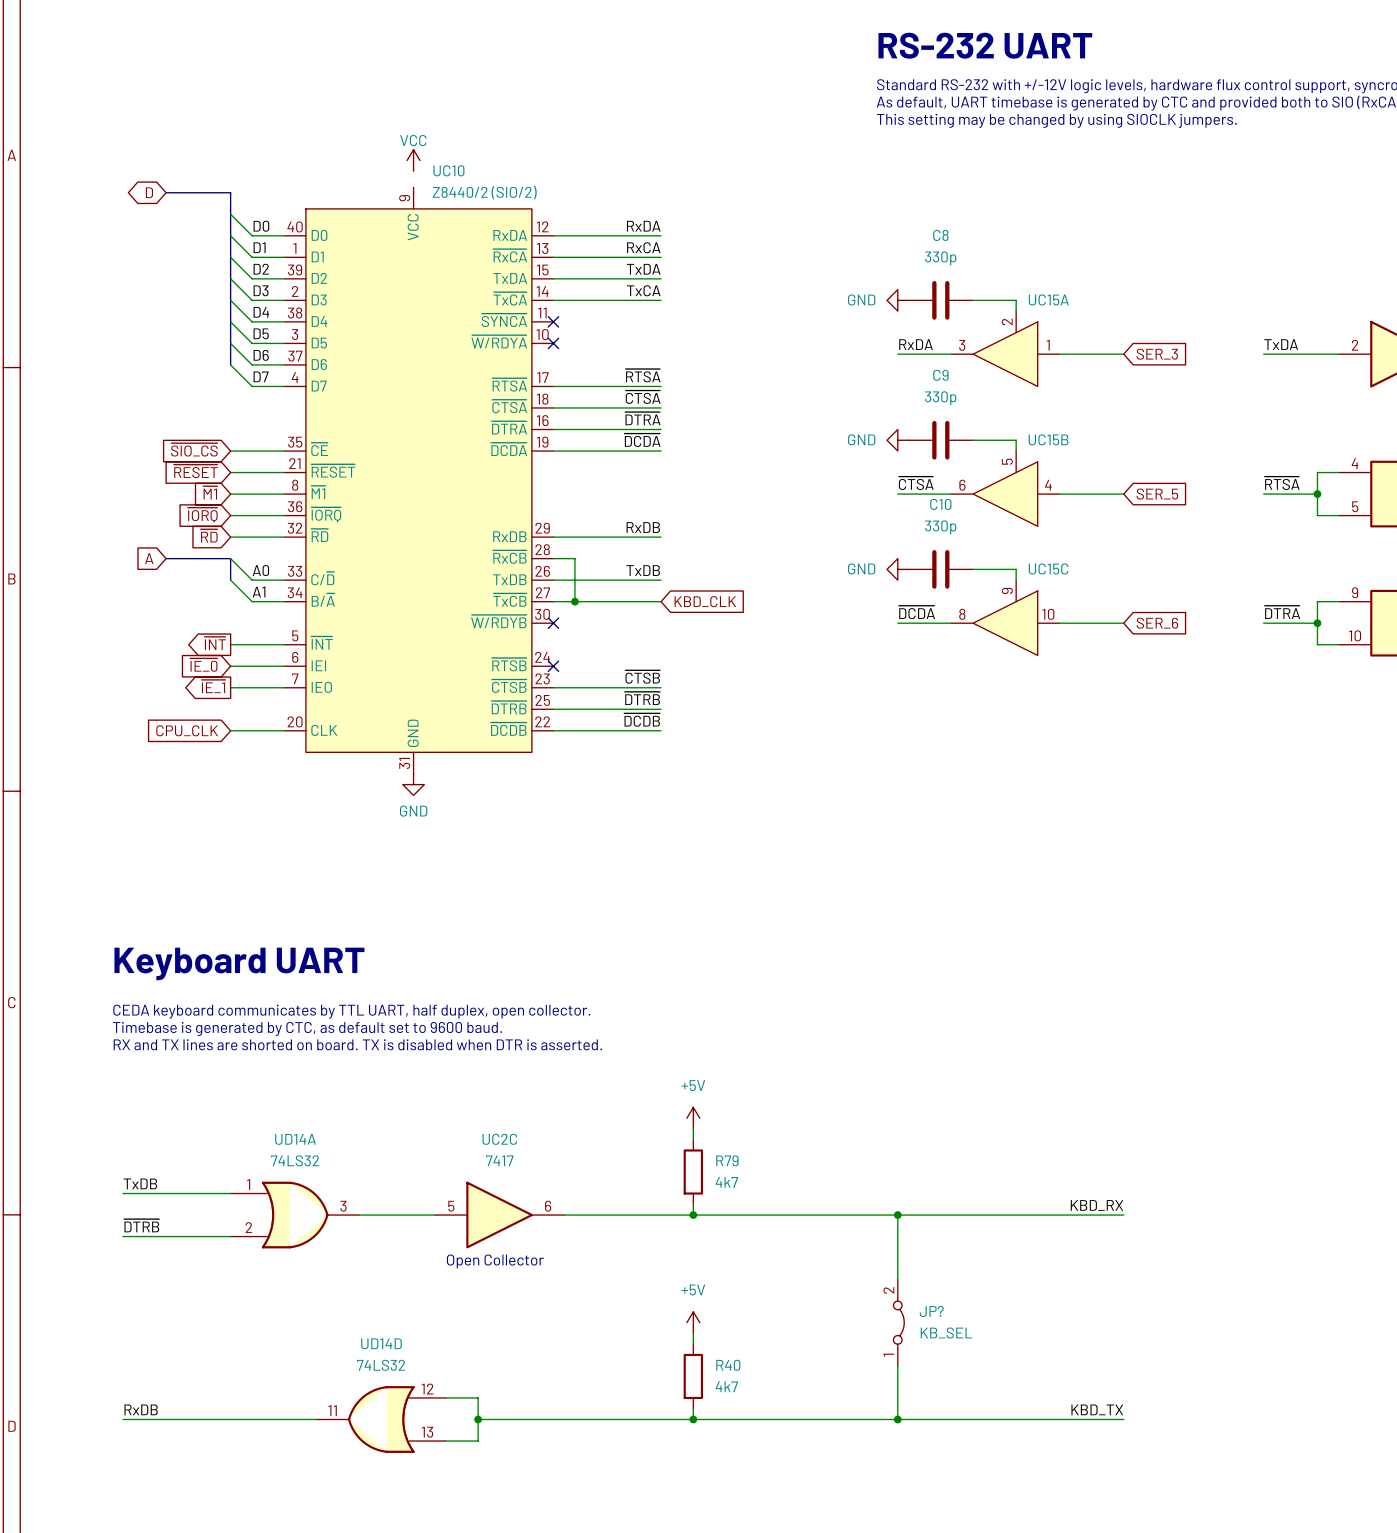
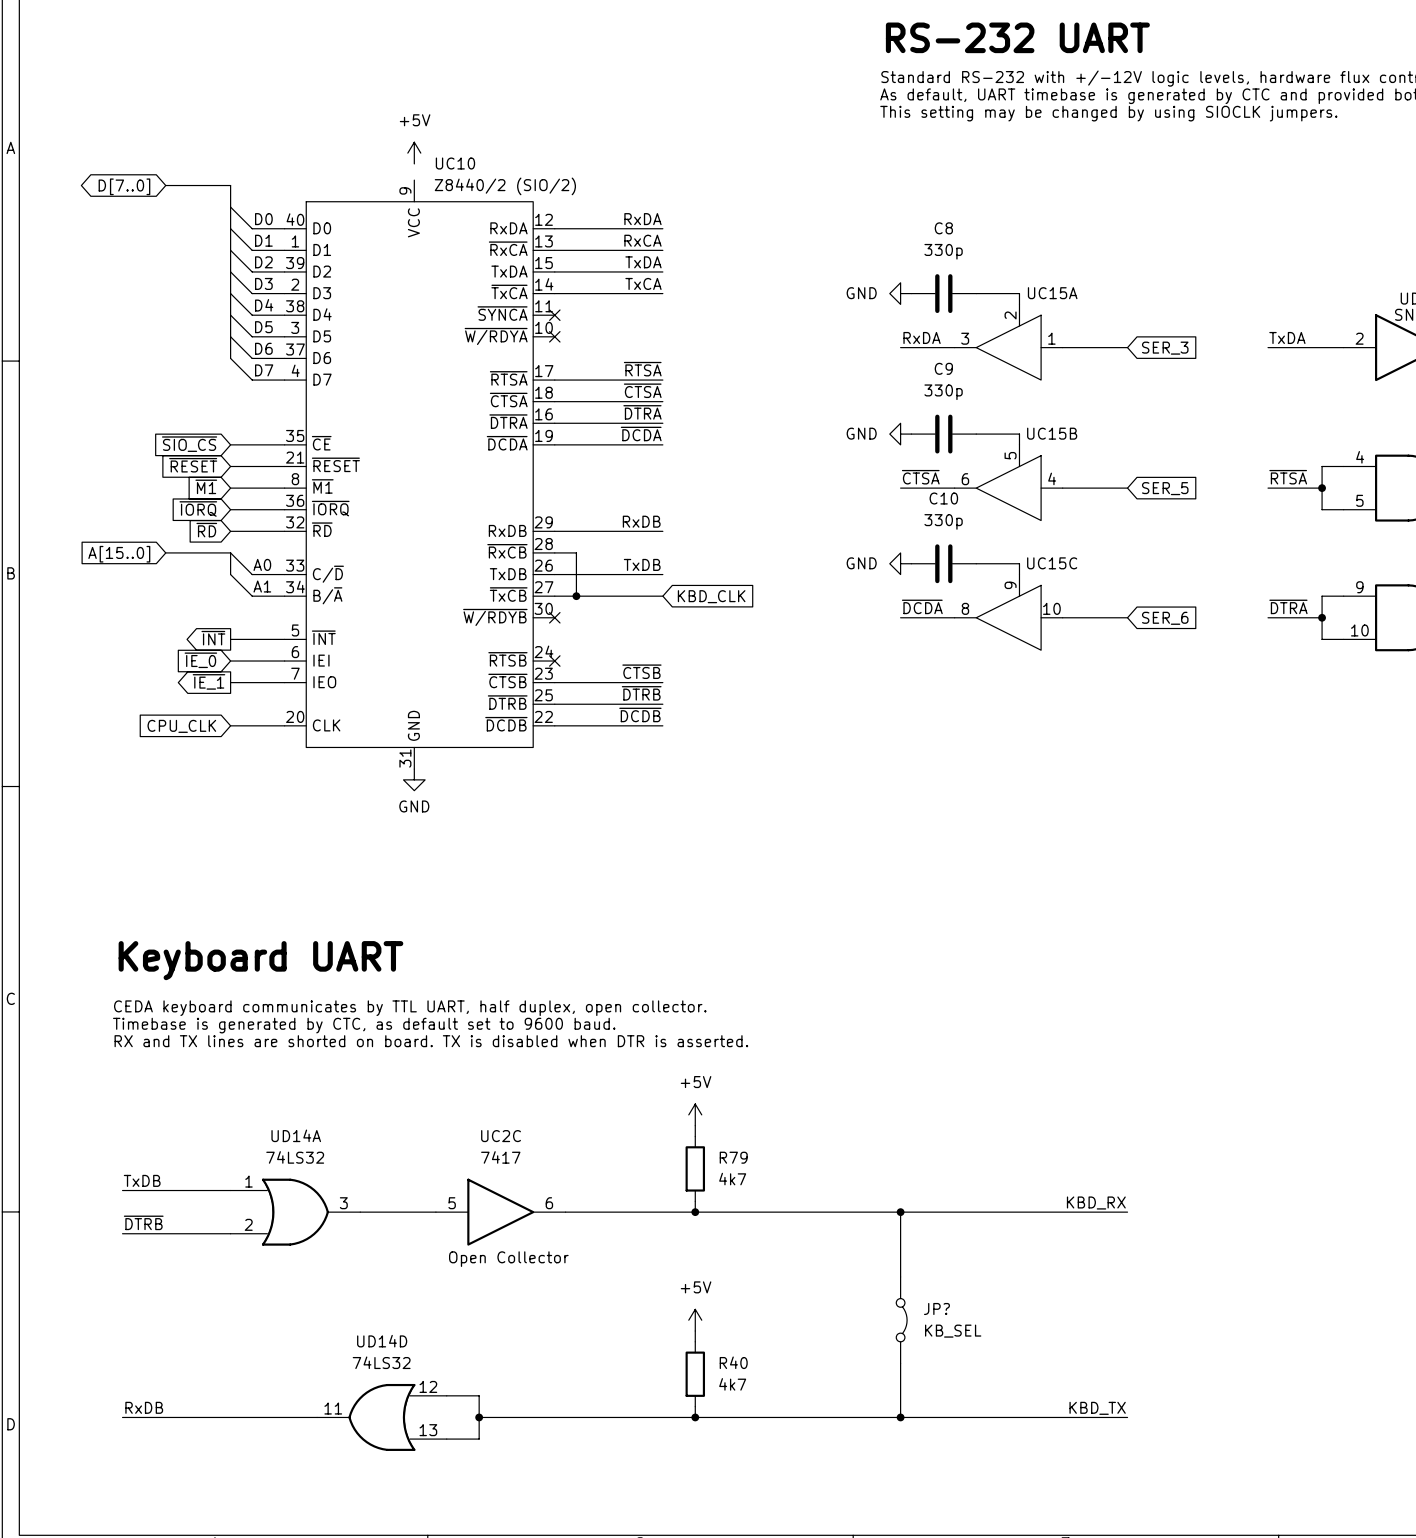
power symbol: VCC (413, 160) -> +5V (414, 153)
global label: D (149, 192) -> D[7..0] (124, 186)
global label: A (149, 558) -> A[15..0] (119, 554)
JP? pin number: 2 (888, 1290) -> none
JP? pin number: 1 (888, 1355) -> none

